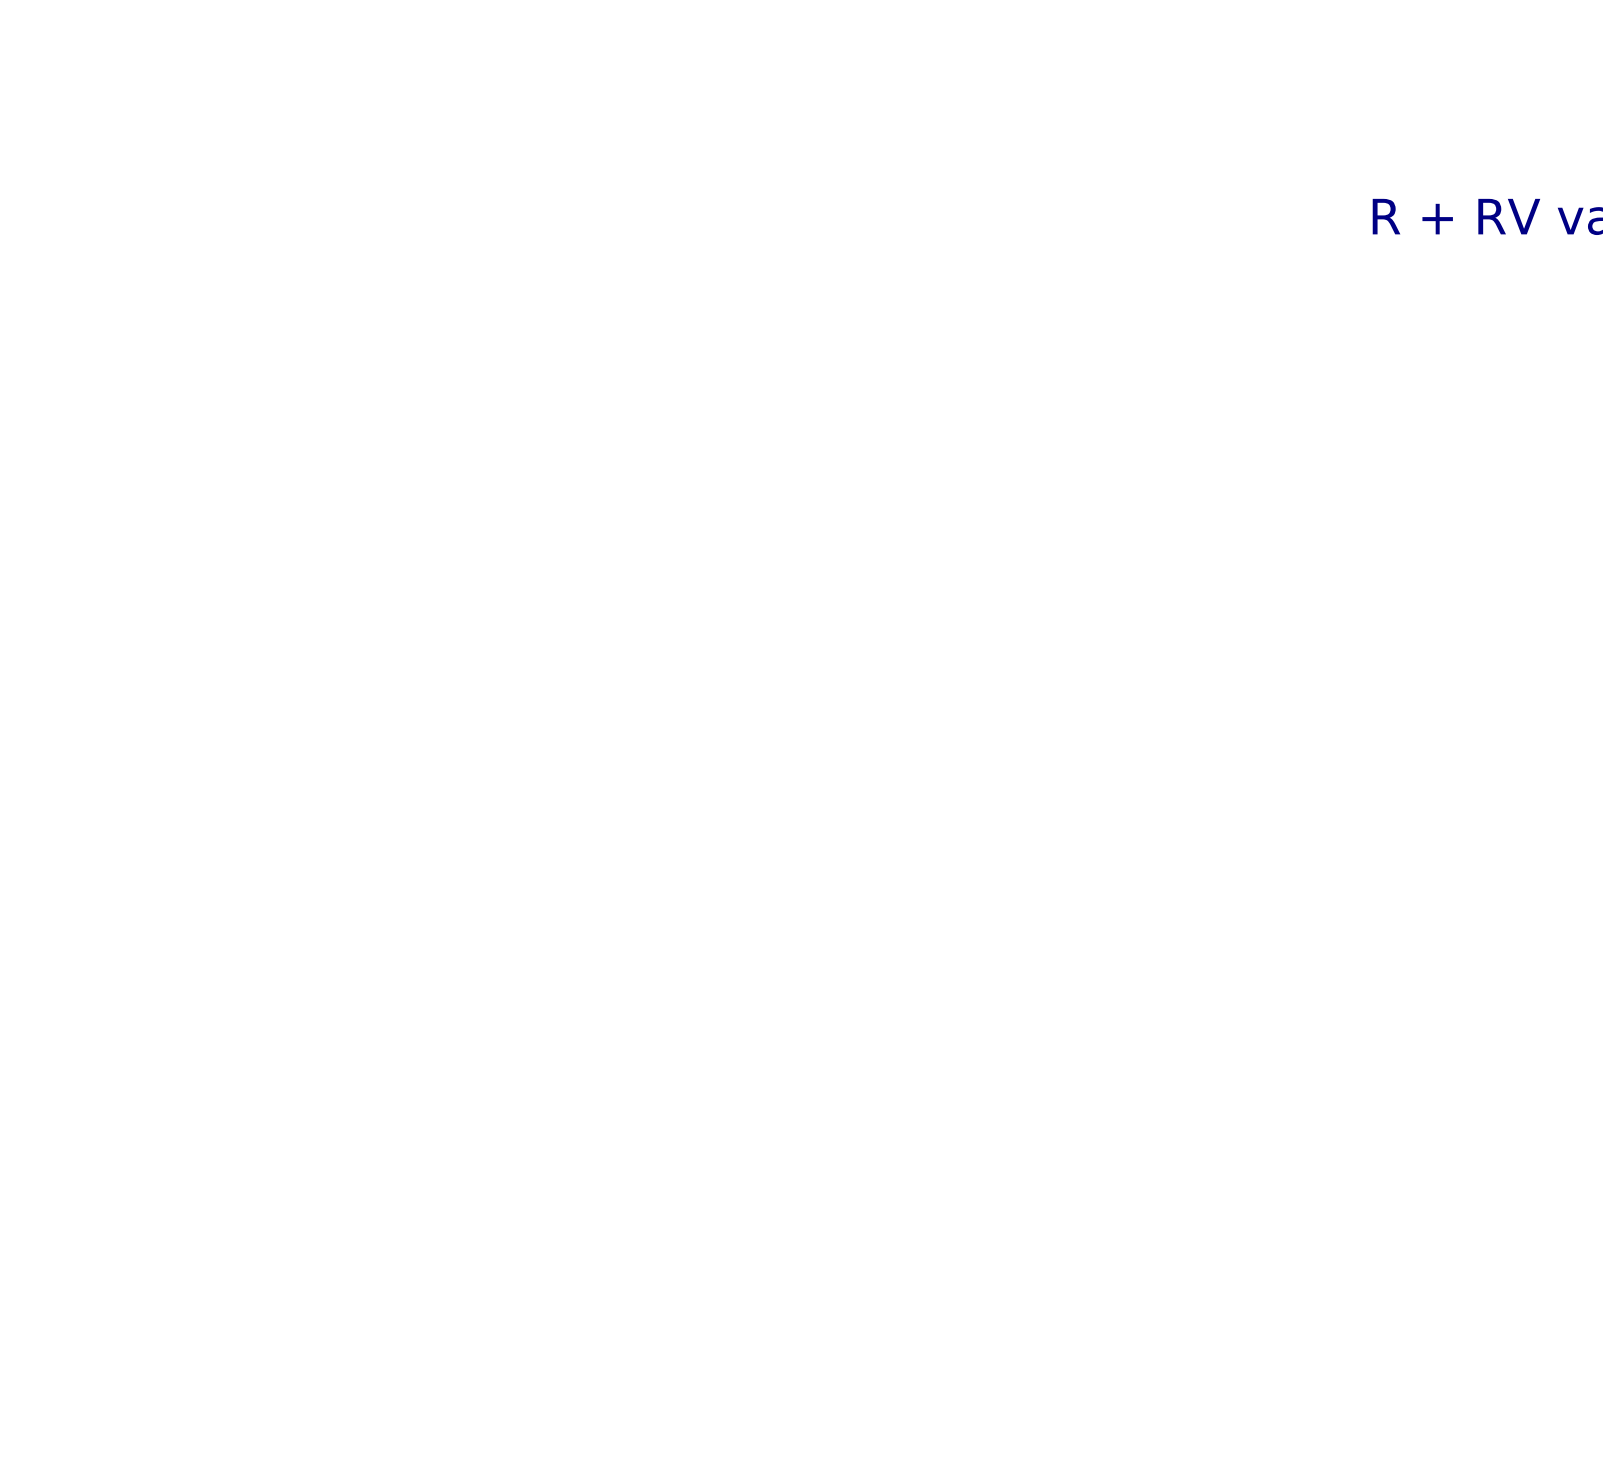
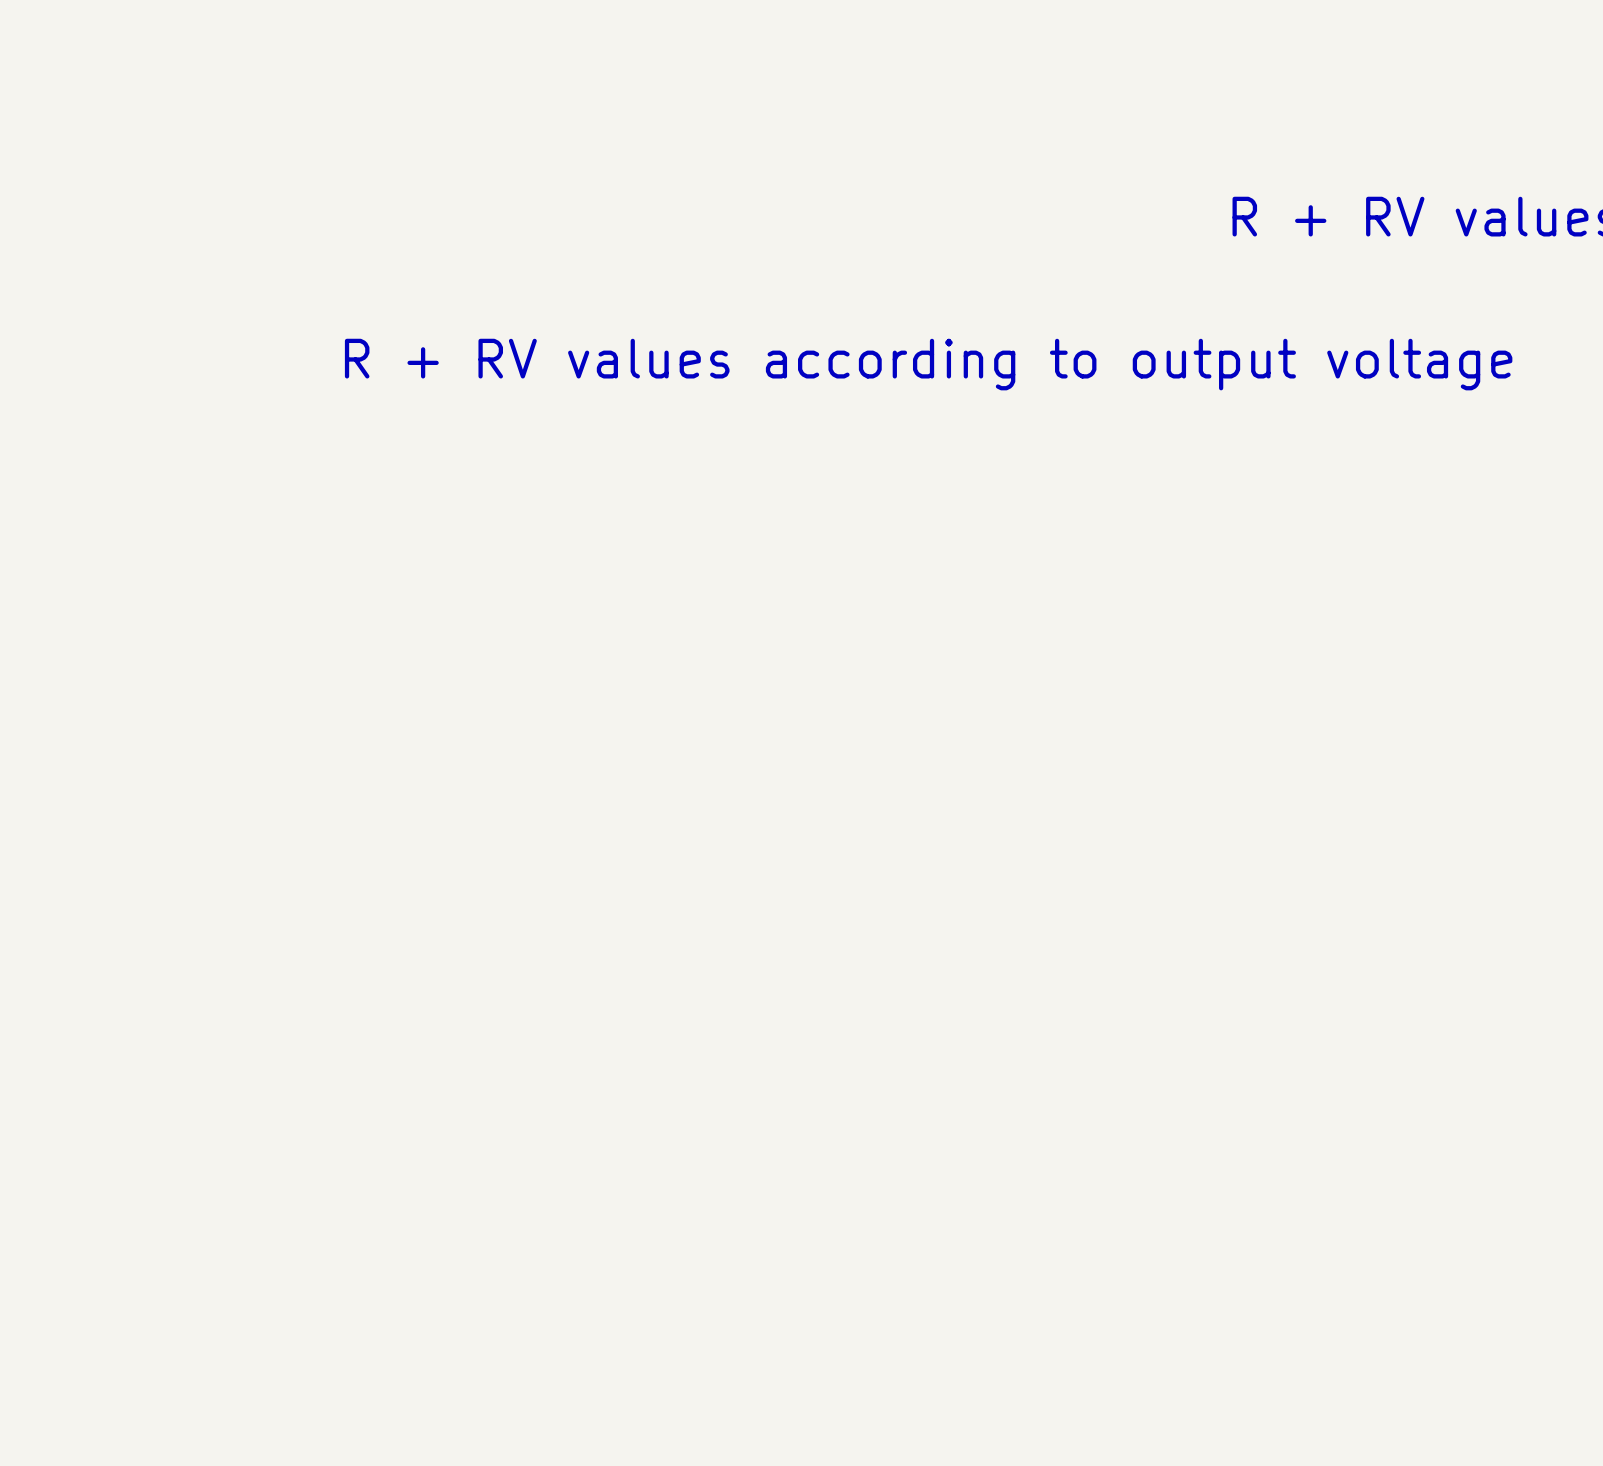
text: none -> R + RV values according to output voltage (928, 364)

